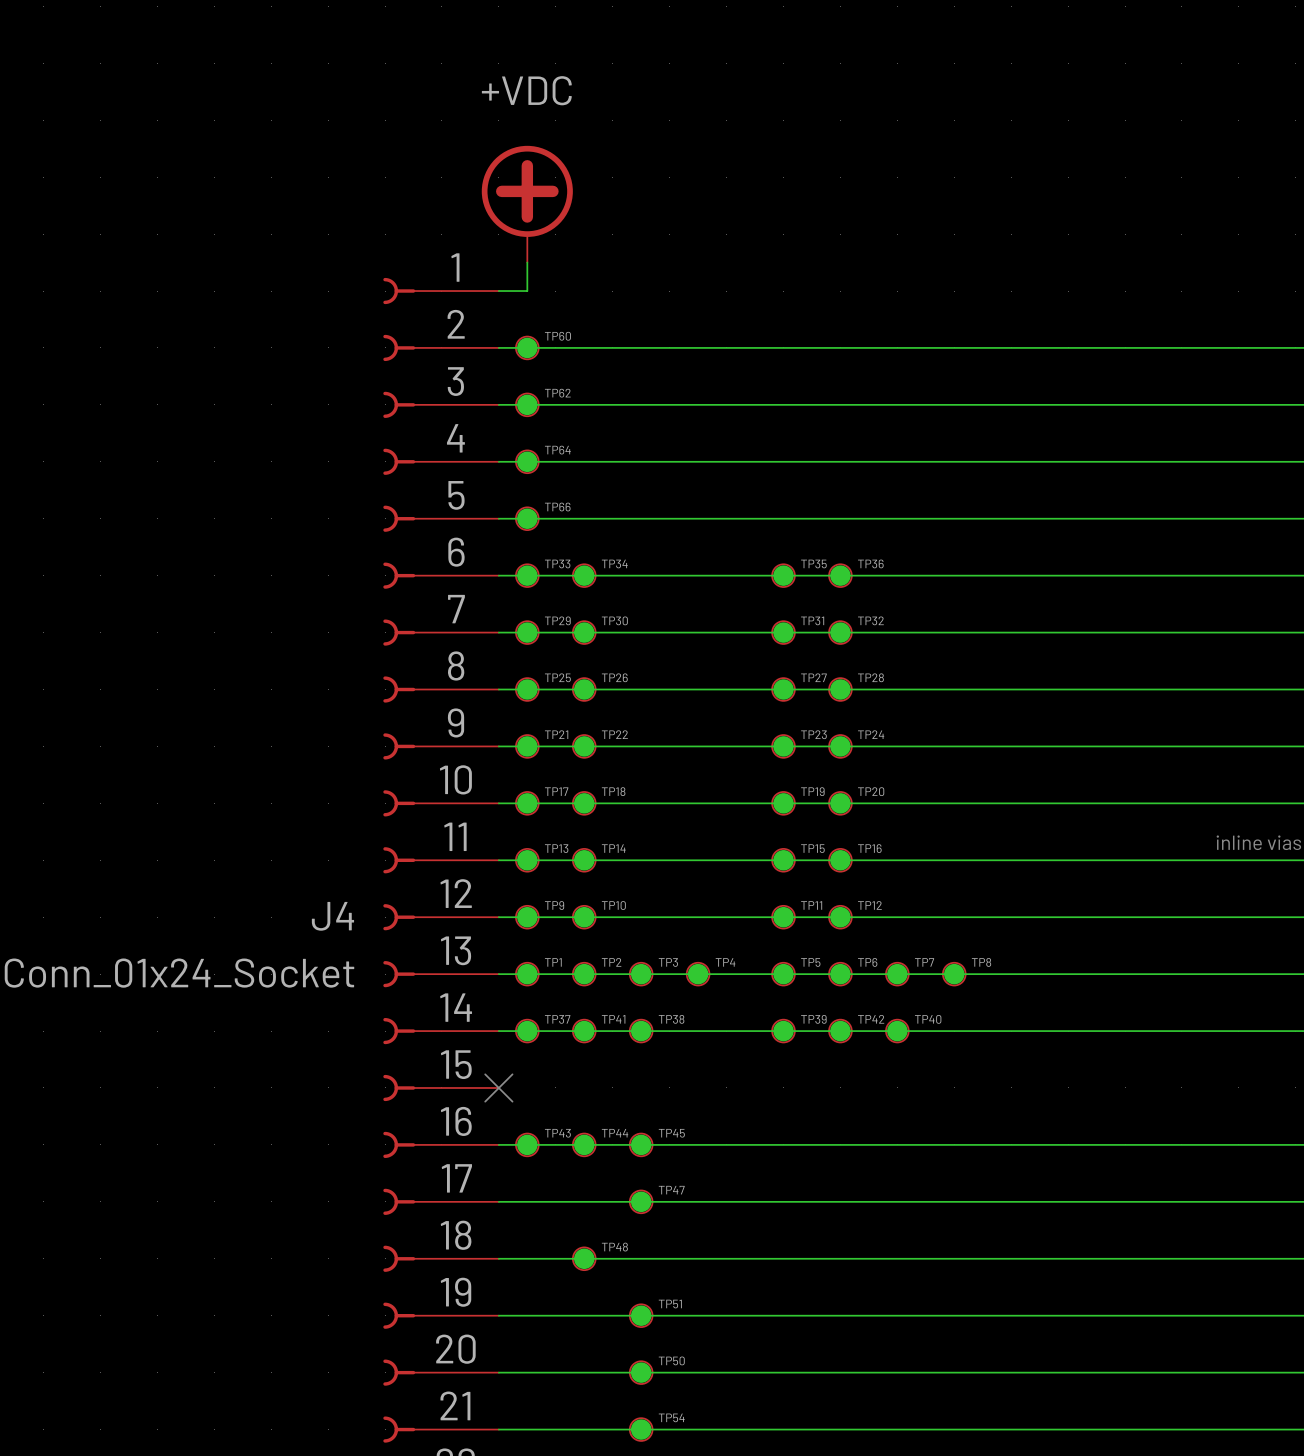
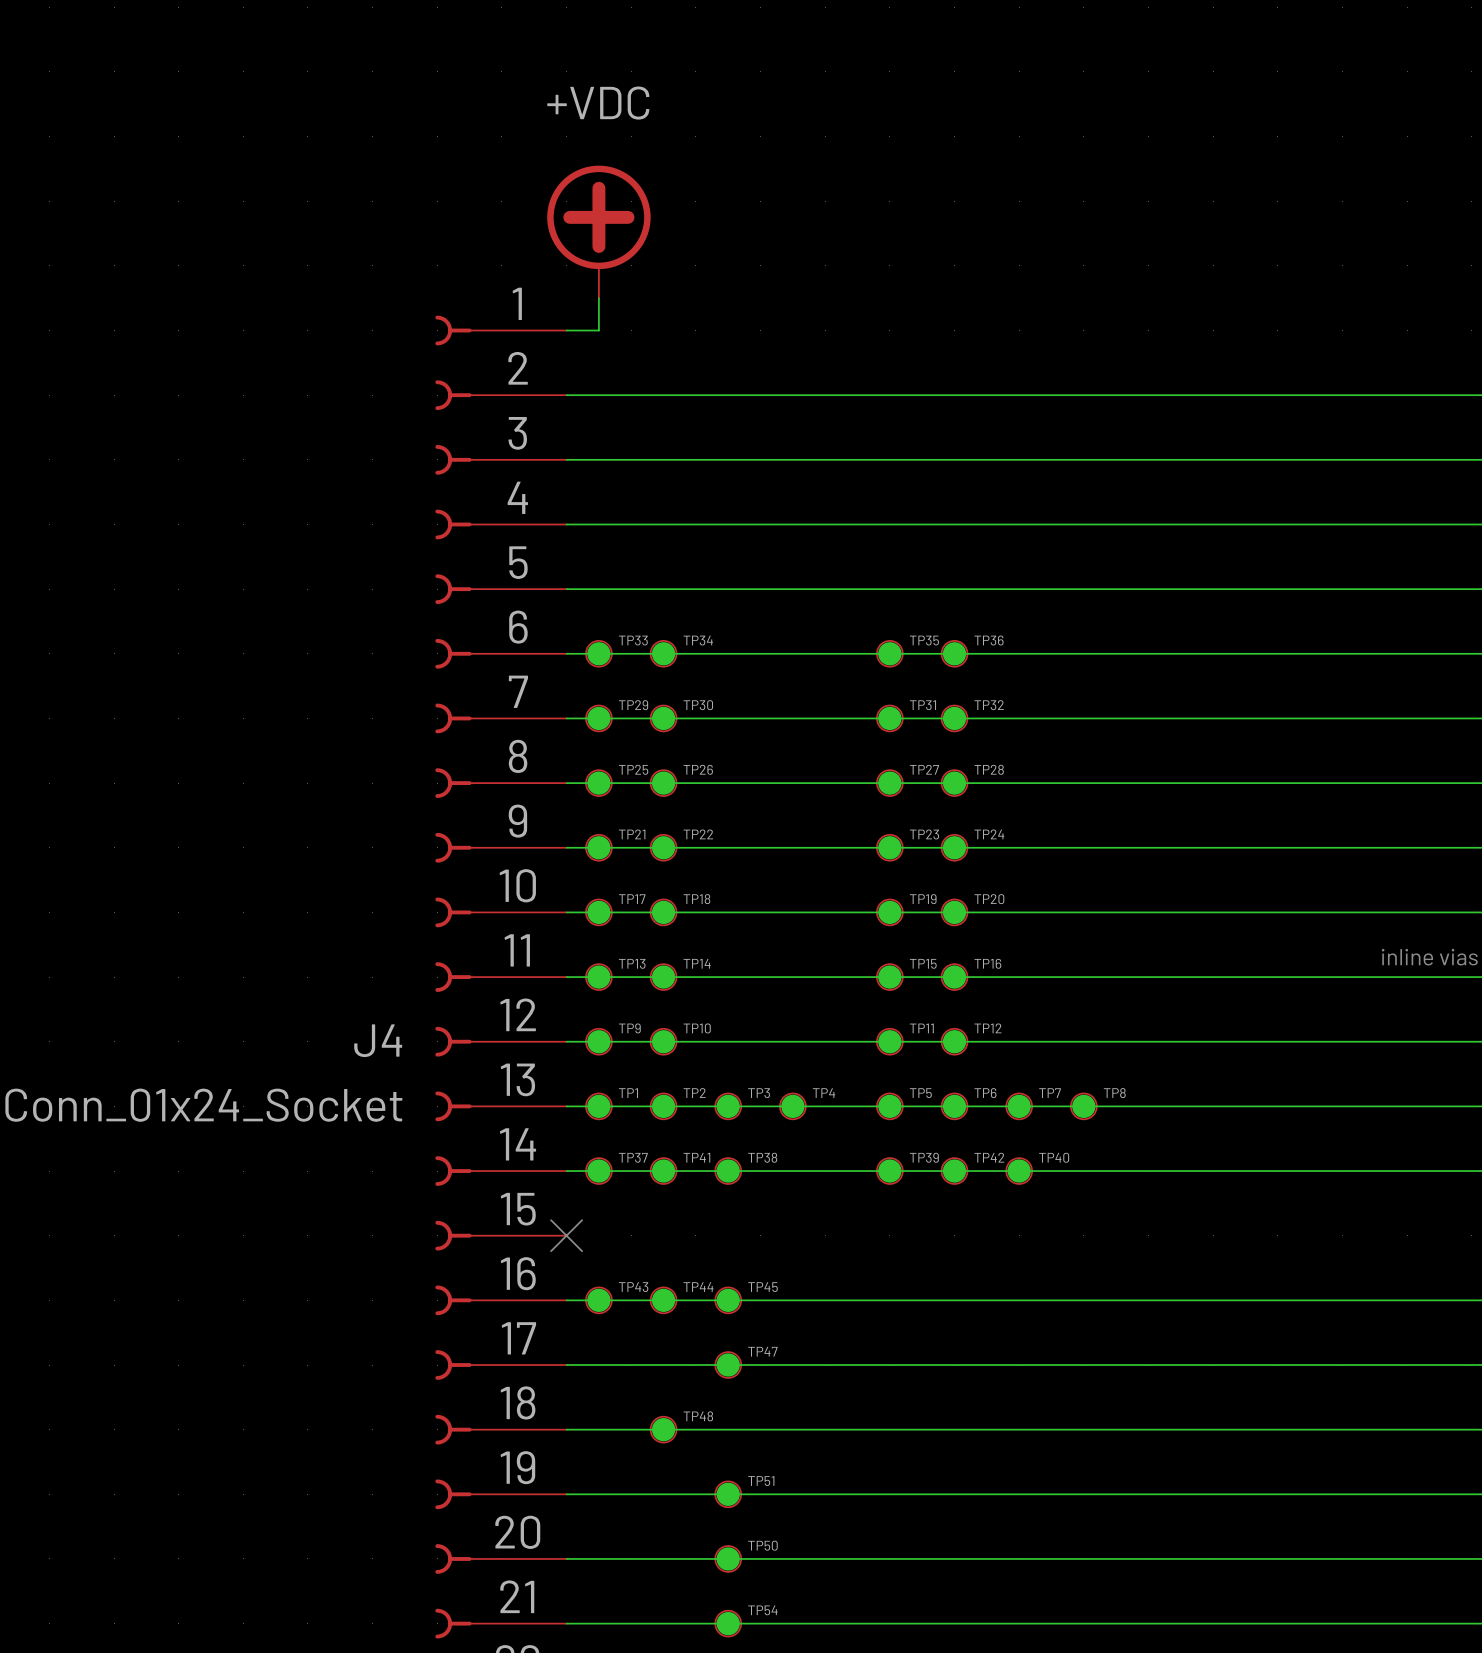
junction: (527, 347) -> none
TP60: (527, 347) -> none
junction: (527, 404) -> none
TP62: (527, 404) -> none
junction: (527, 461) -> none
TP64: (527, 461) -> none
junction: (527, 518) -> none
TP66: (527, 518) -> none

